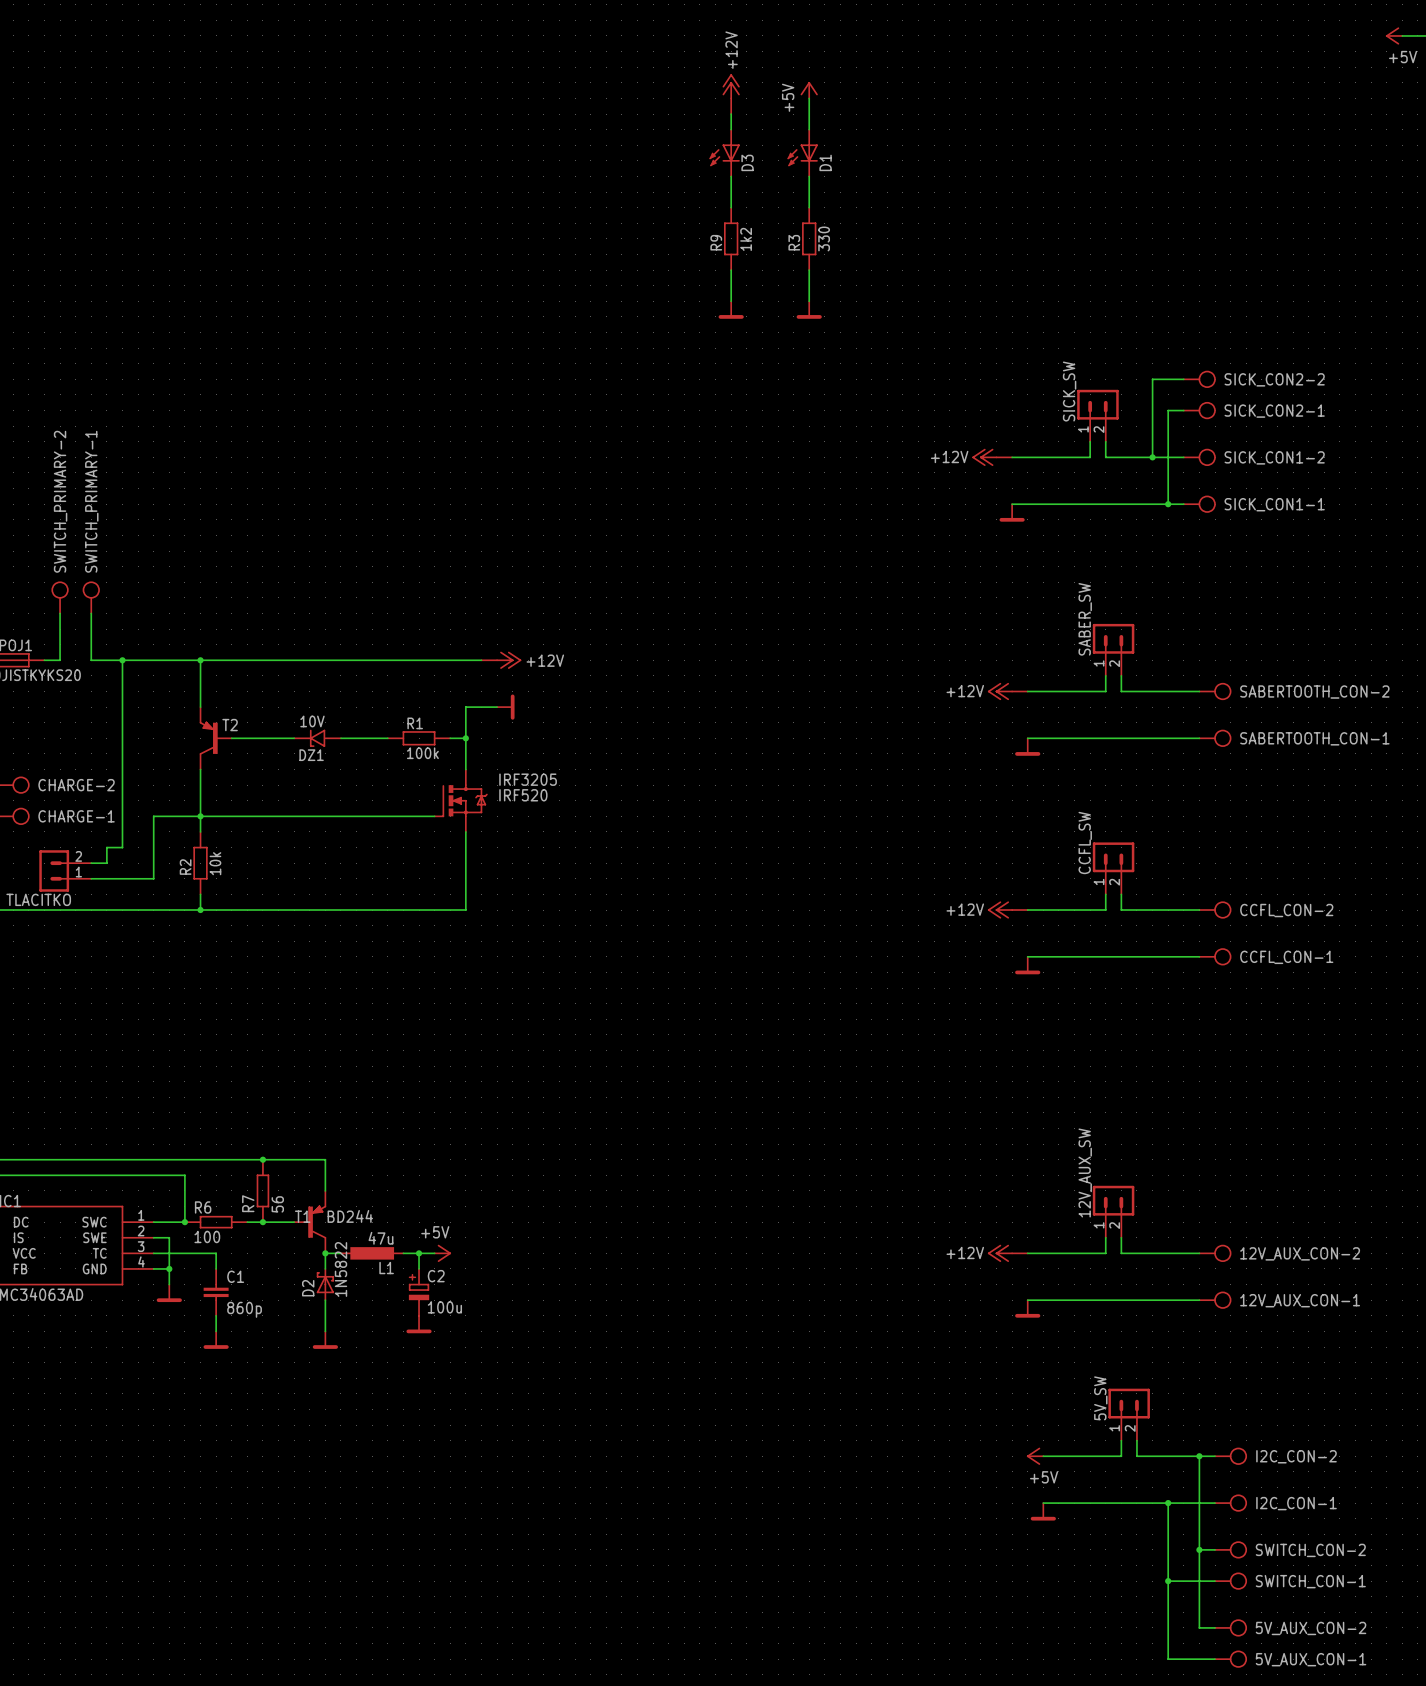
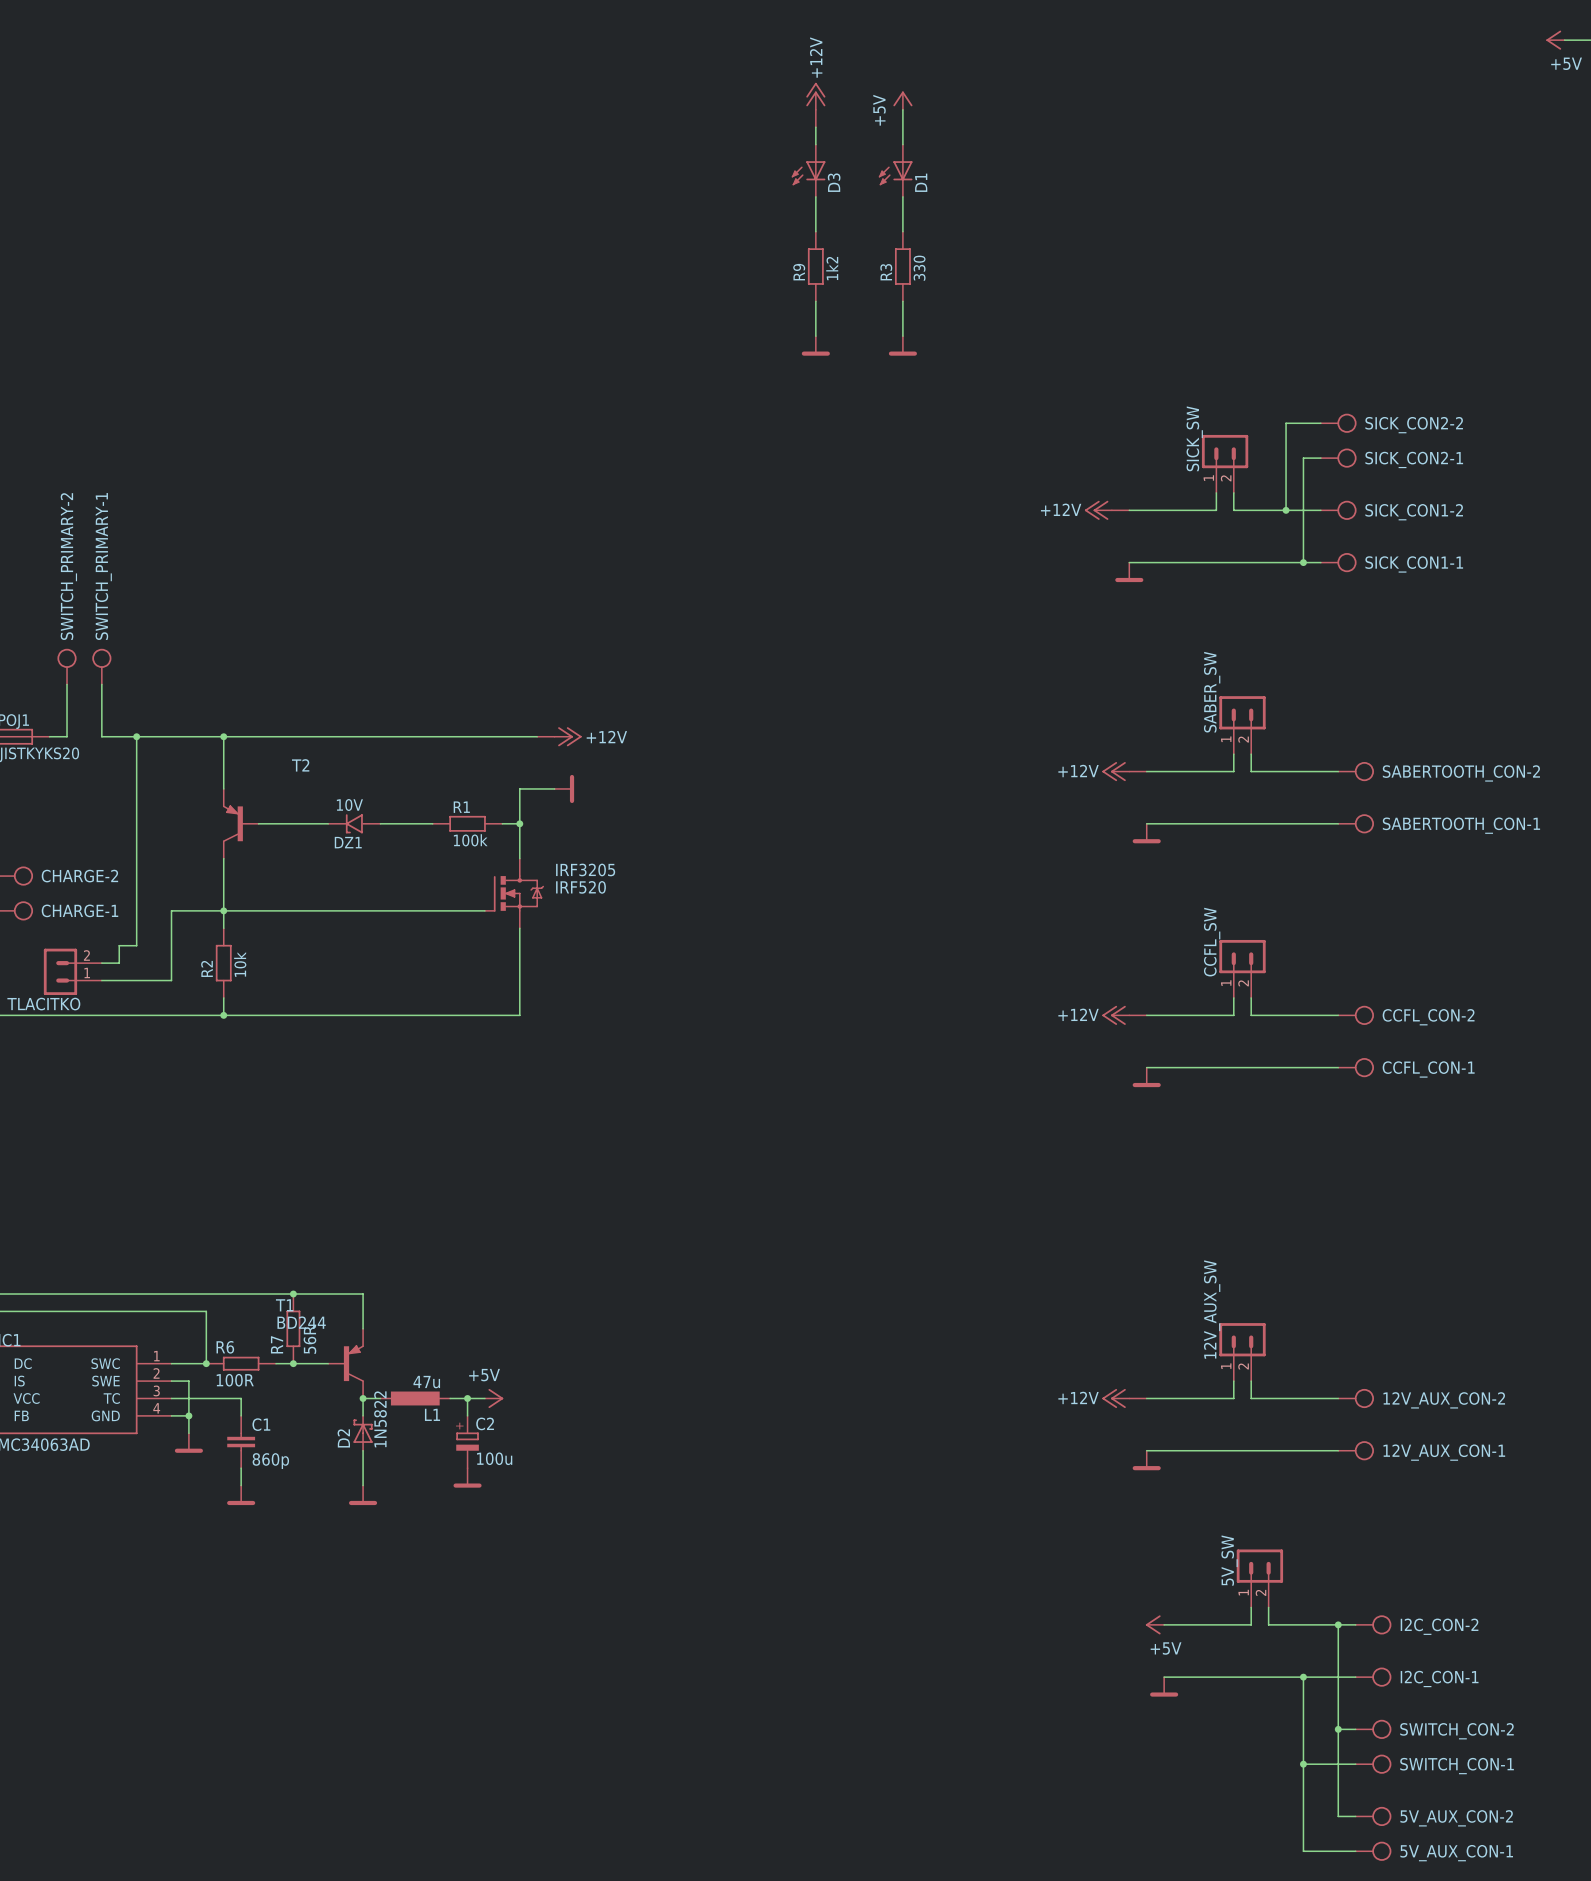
T2 name position: T2 (230, 725) -> T2 (300, 765)
R7 value: 56 (277, 1204) -> 56R (309, 1339)
T1 name position: T1 (302, 1216) -> T1 (284, 1305)
T1 value position: BD244 (350, 1216) -> BD244 (301, 1322)
R6 value: 100 (207, 1236) -> 100R (235, 1380)

